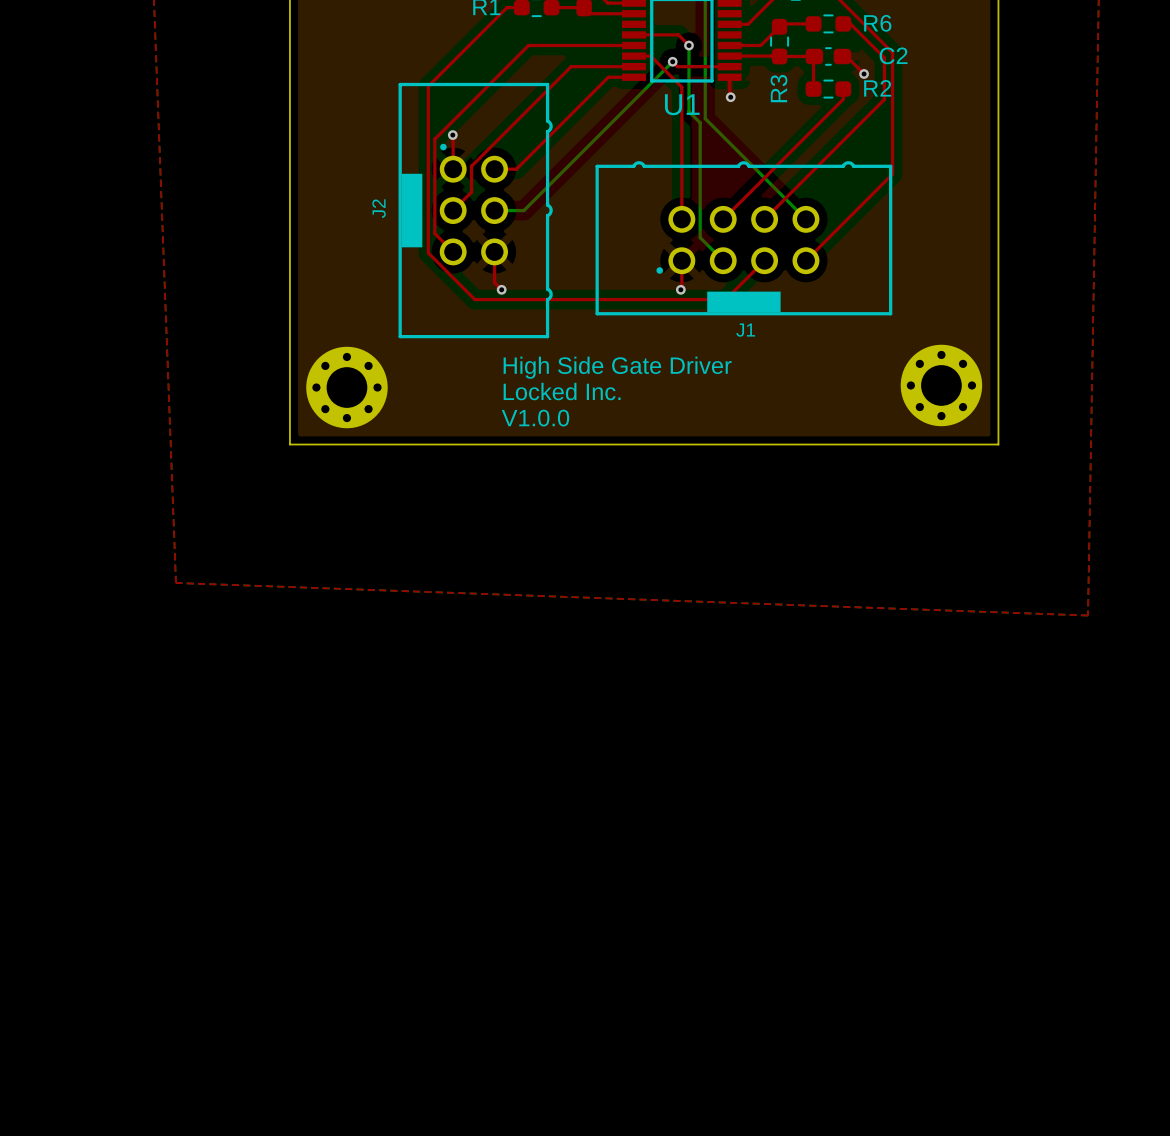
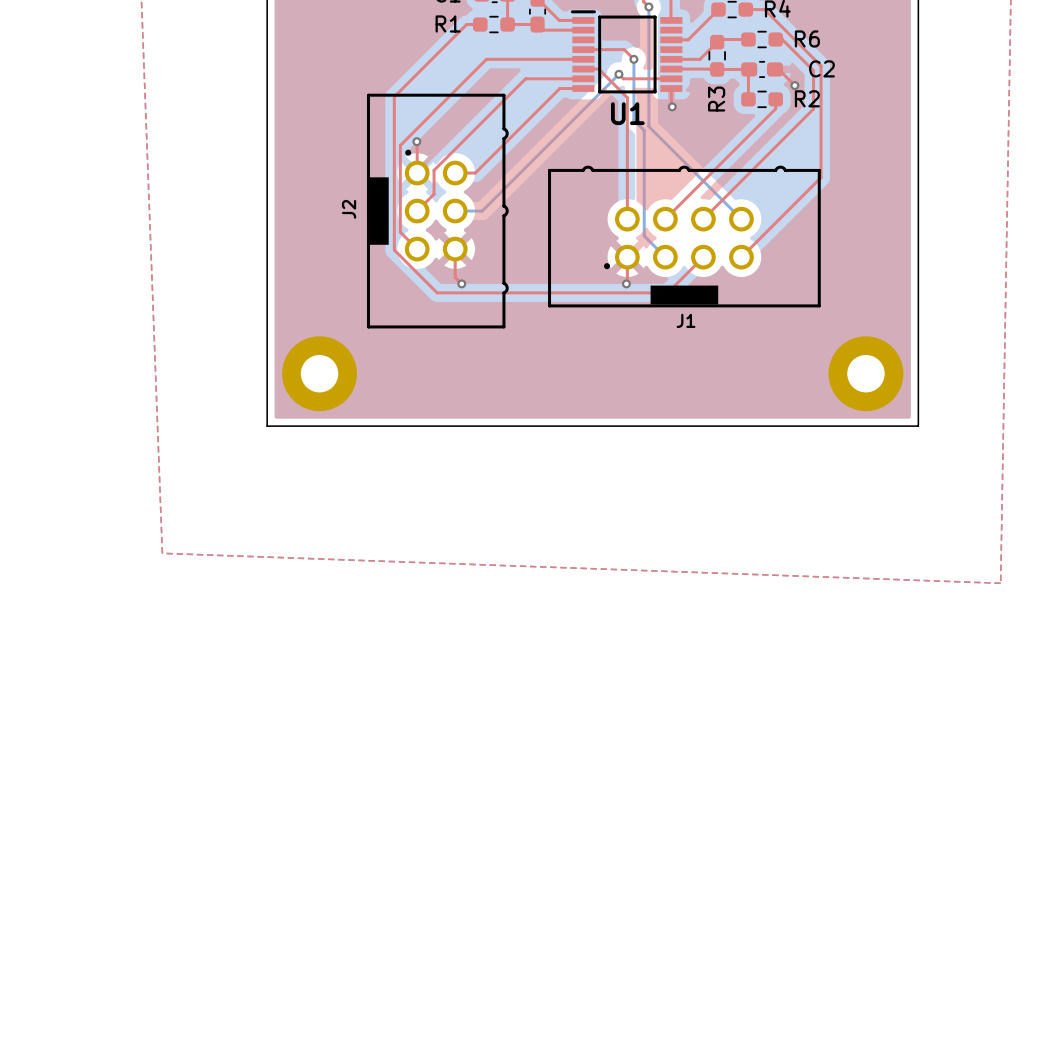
part footprint: [900, 344, 983, 427] -> [828, 336, 904, 412]
part footprint: [306, 346, 388, 429] -> [282, 336, 357, 412]
text: High Side Gate Driver (617, 367) -> none
text: Locked Inc. (562, 391) -> none
text: V1.0.0 (535, 418) -> none

